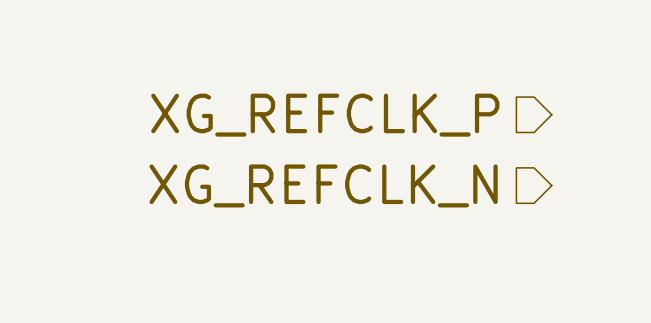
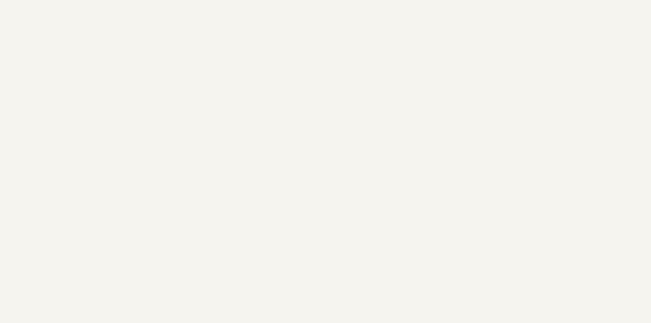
hierarchical label: XG_REFCLK_P (325, 115) -> none
hierarchical label: XG_REFCLK_N (323, 185) -> none

